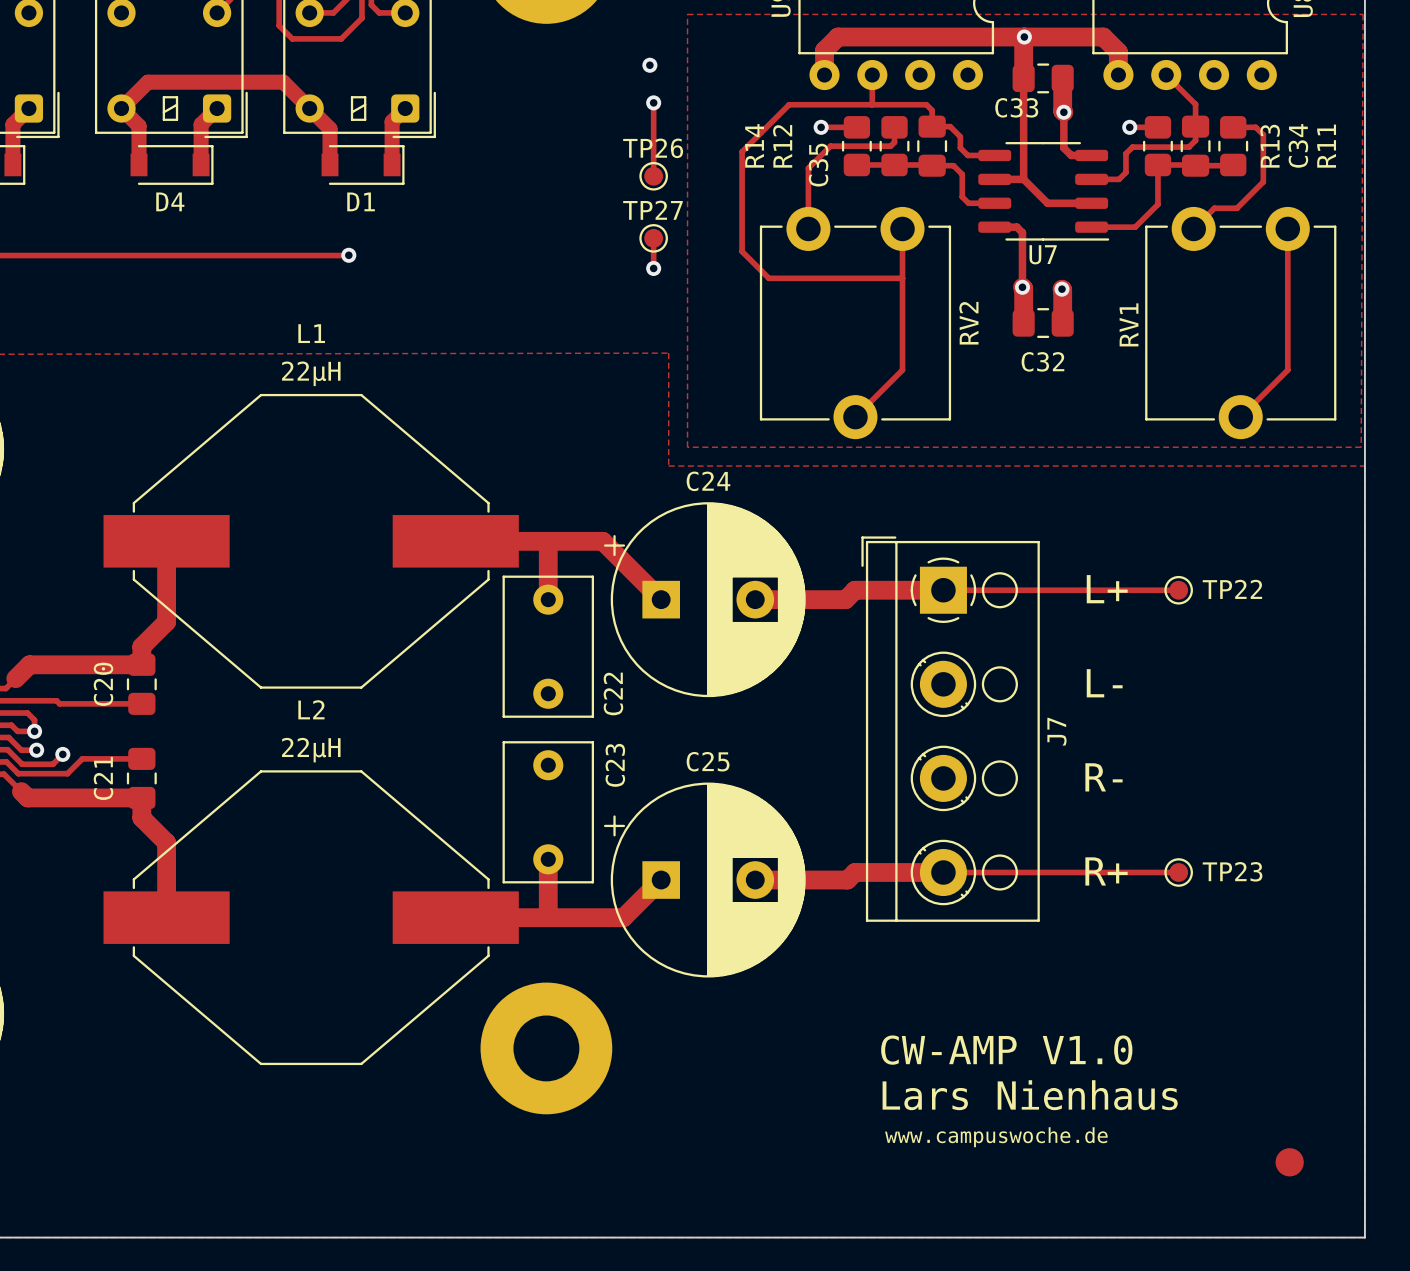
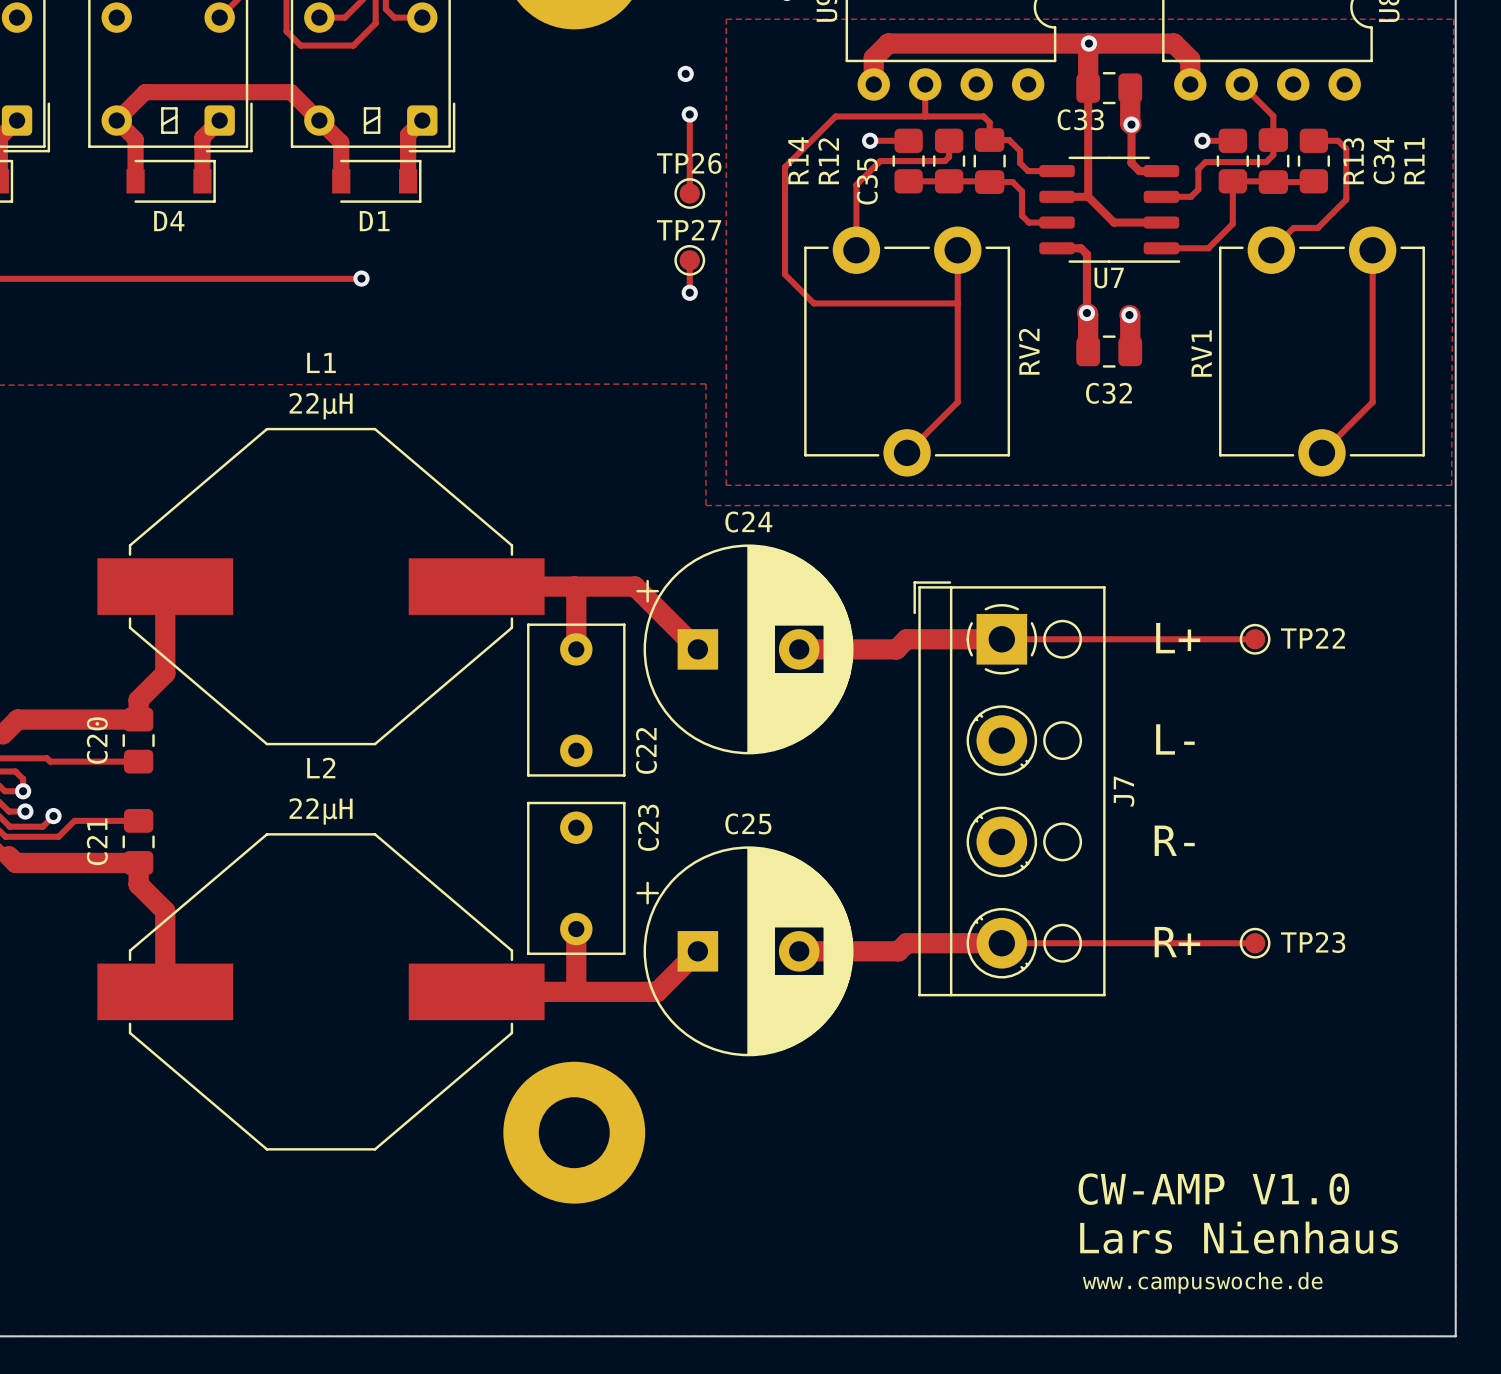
text position: CW-AMP V1.0 (1006, 1050) -> CW-AMP V1.0 (1213, 1189)
text position: Lars Nienhaus (1030, 1095) -> Lars Nienhaus (1239, 1237)
text position: www.campuswoche.de (996, 1137) -> www.campuswoche.de (1202, 1282)
part: (1289, 1162) -> none

